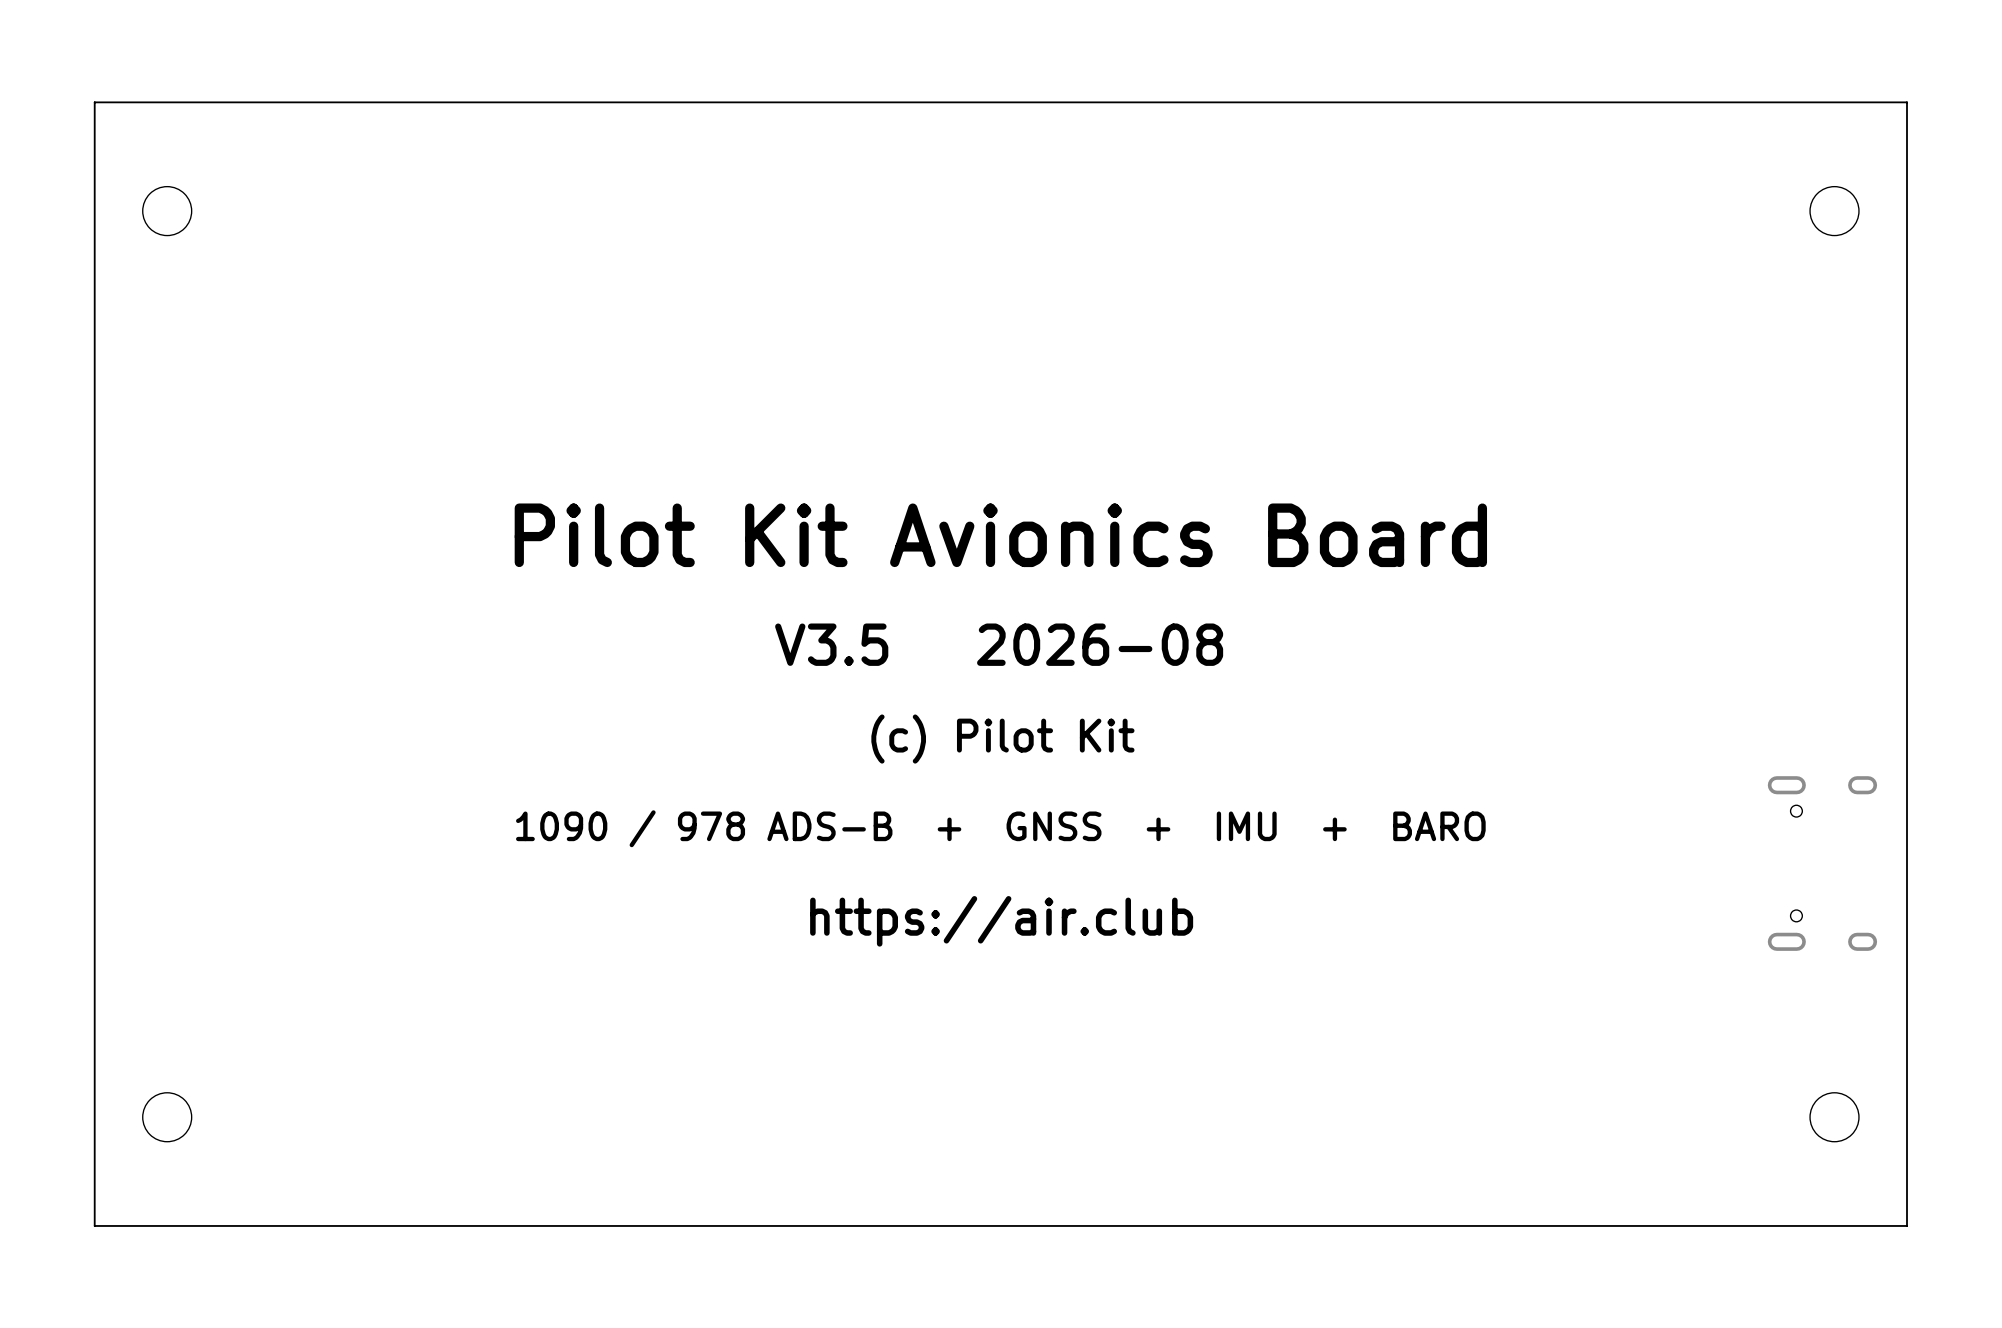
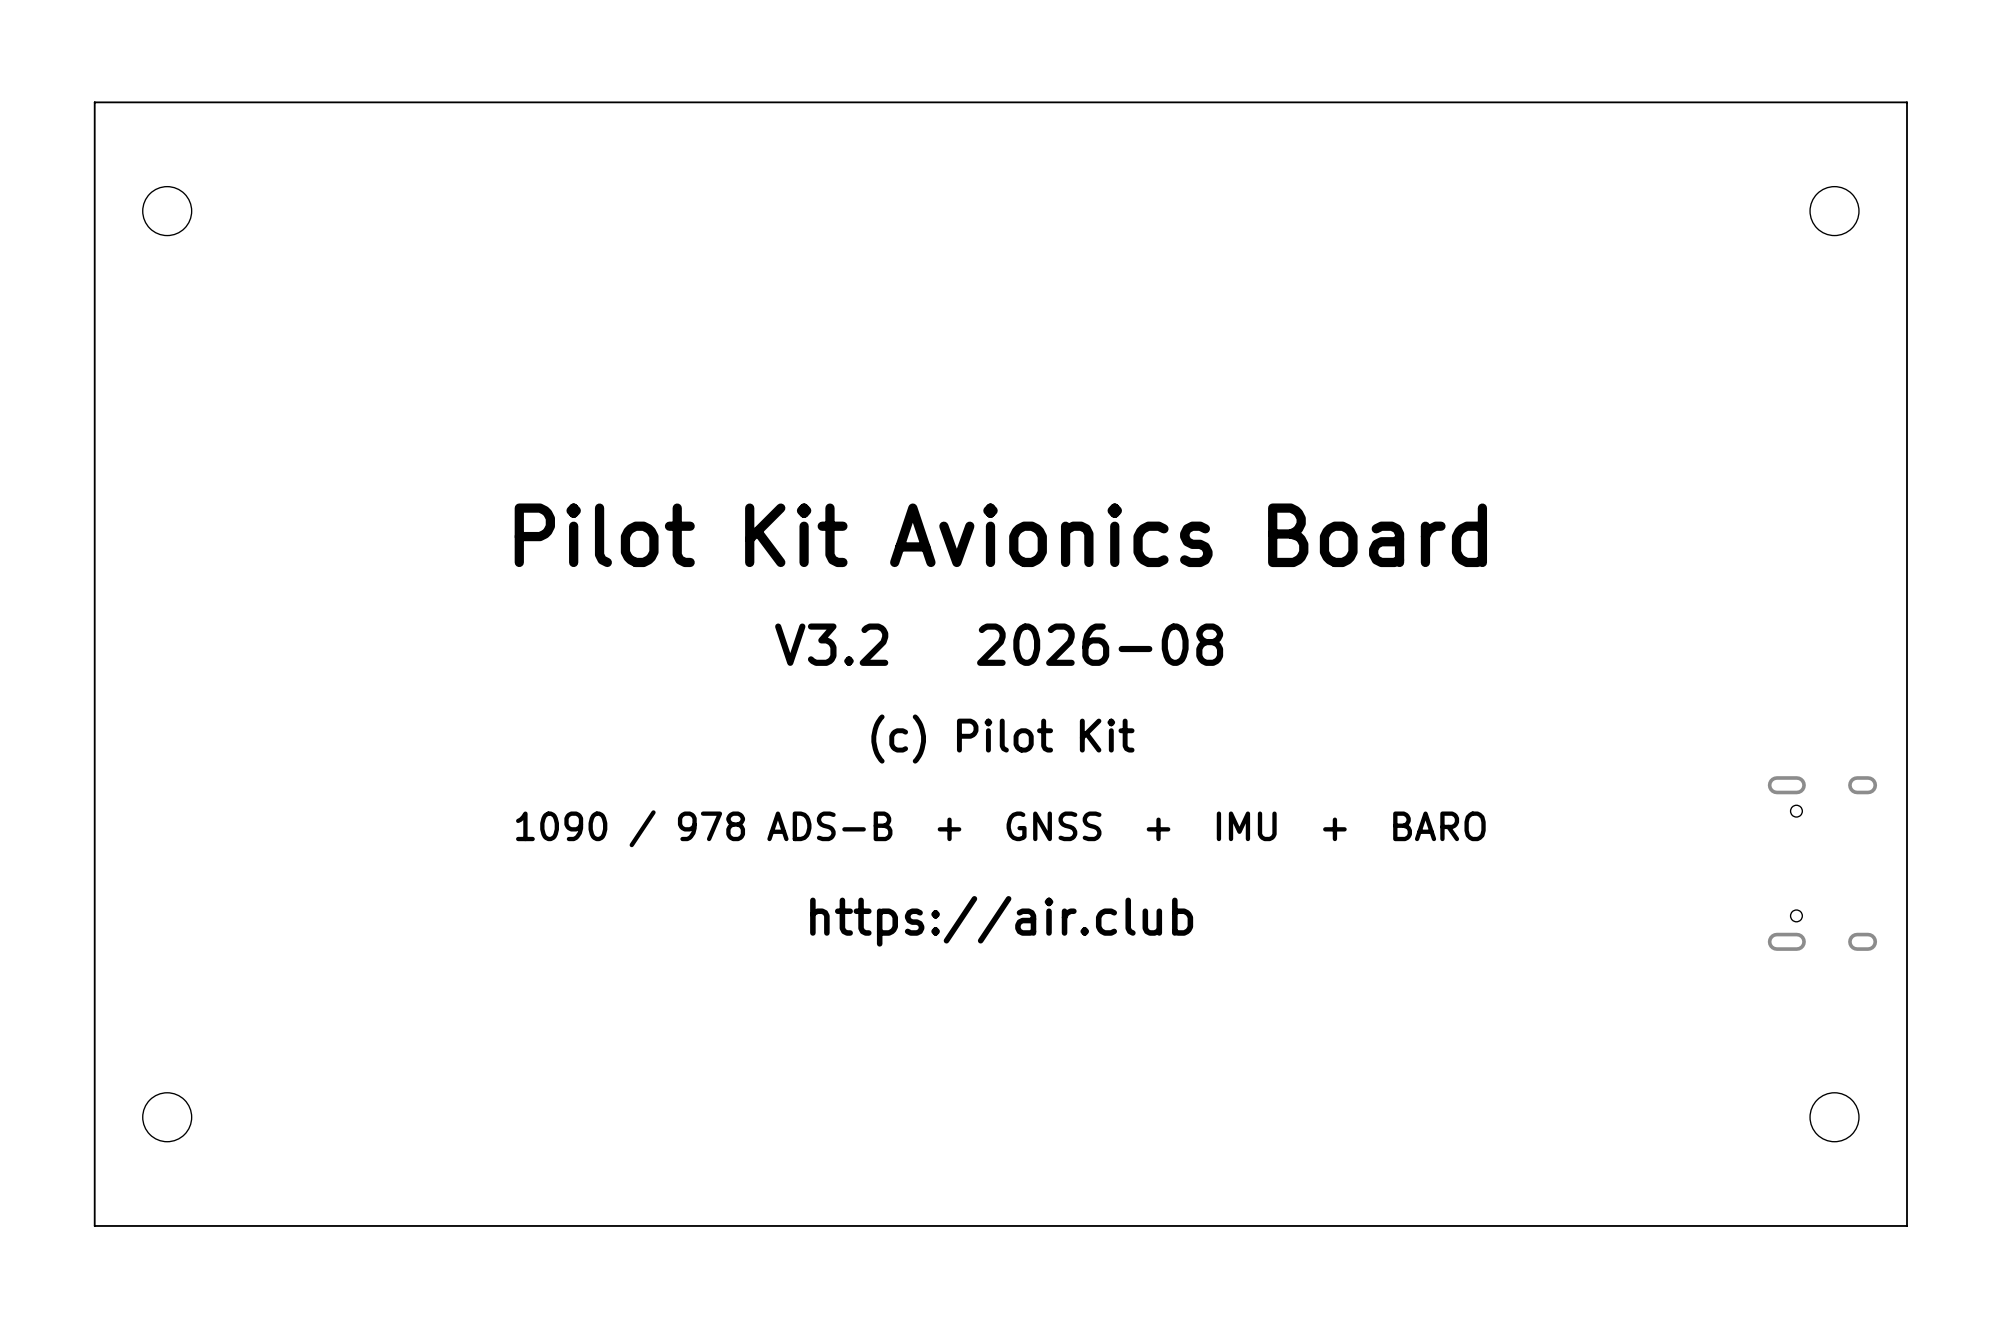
text: V3.5 2026-08 (999, 644) -> V3.2 2026-08 (999, 644)

